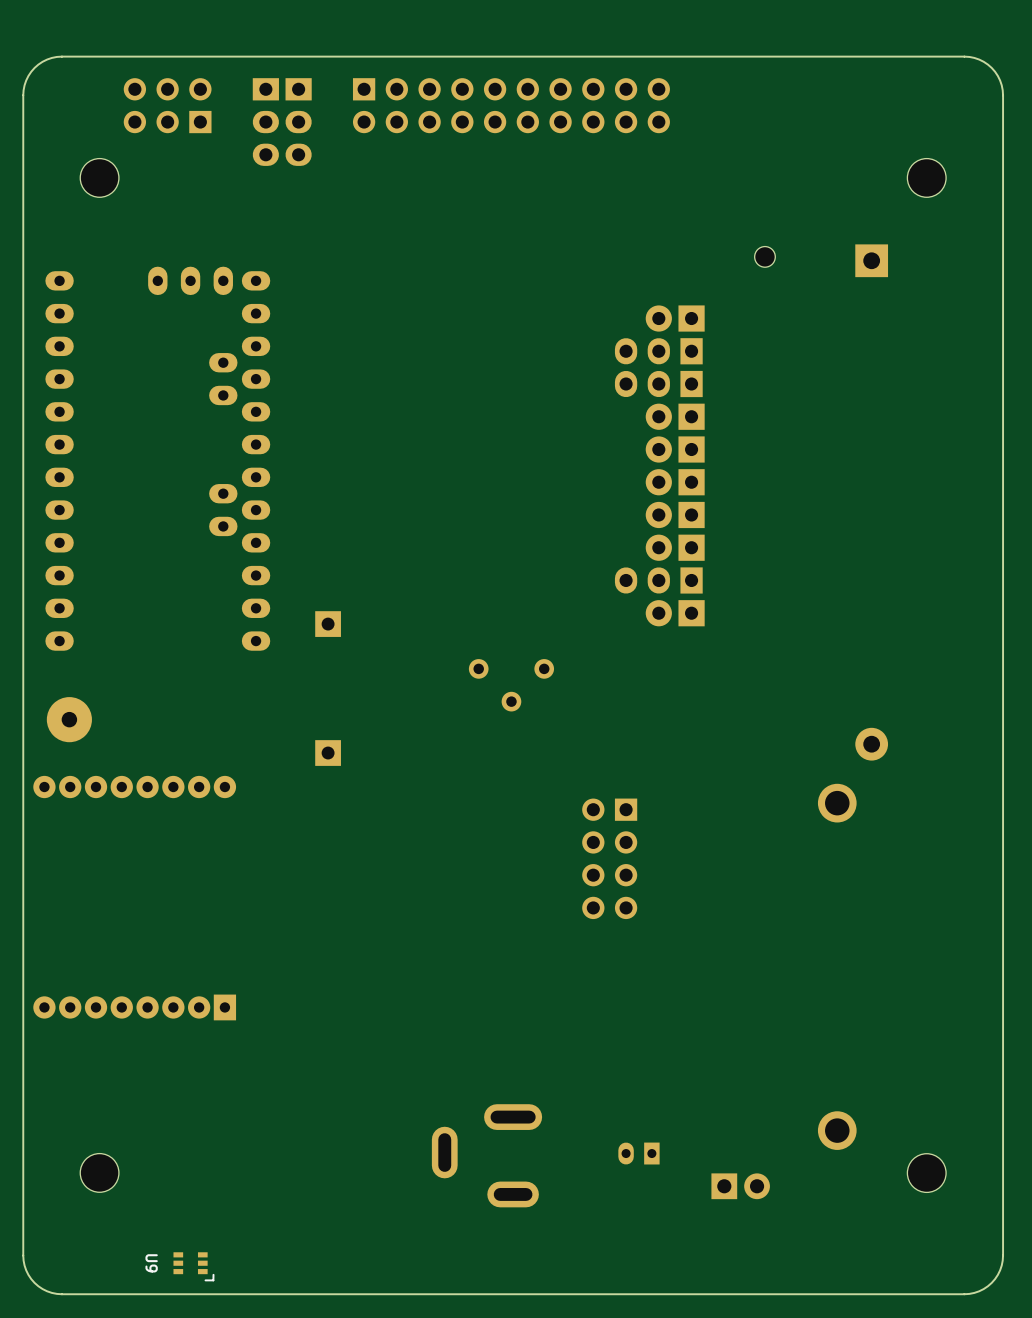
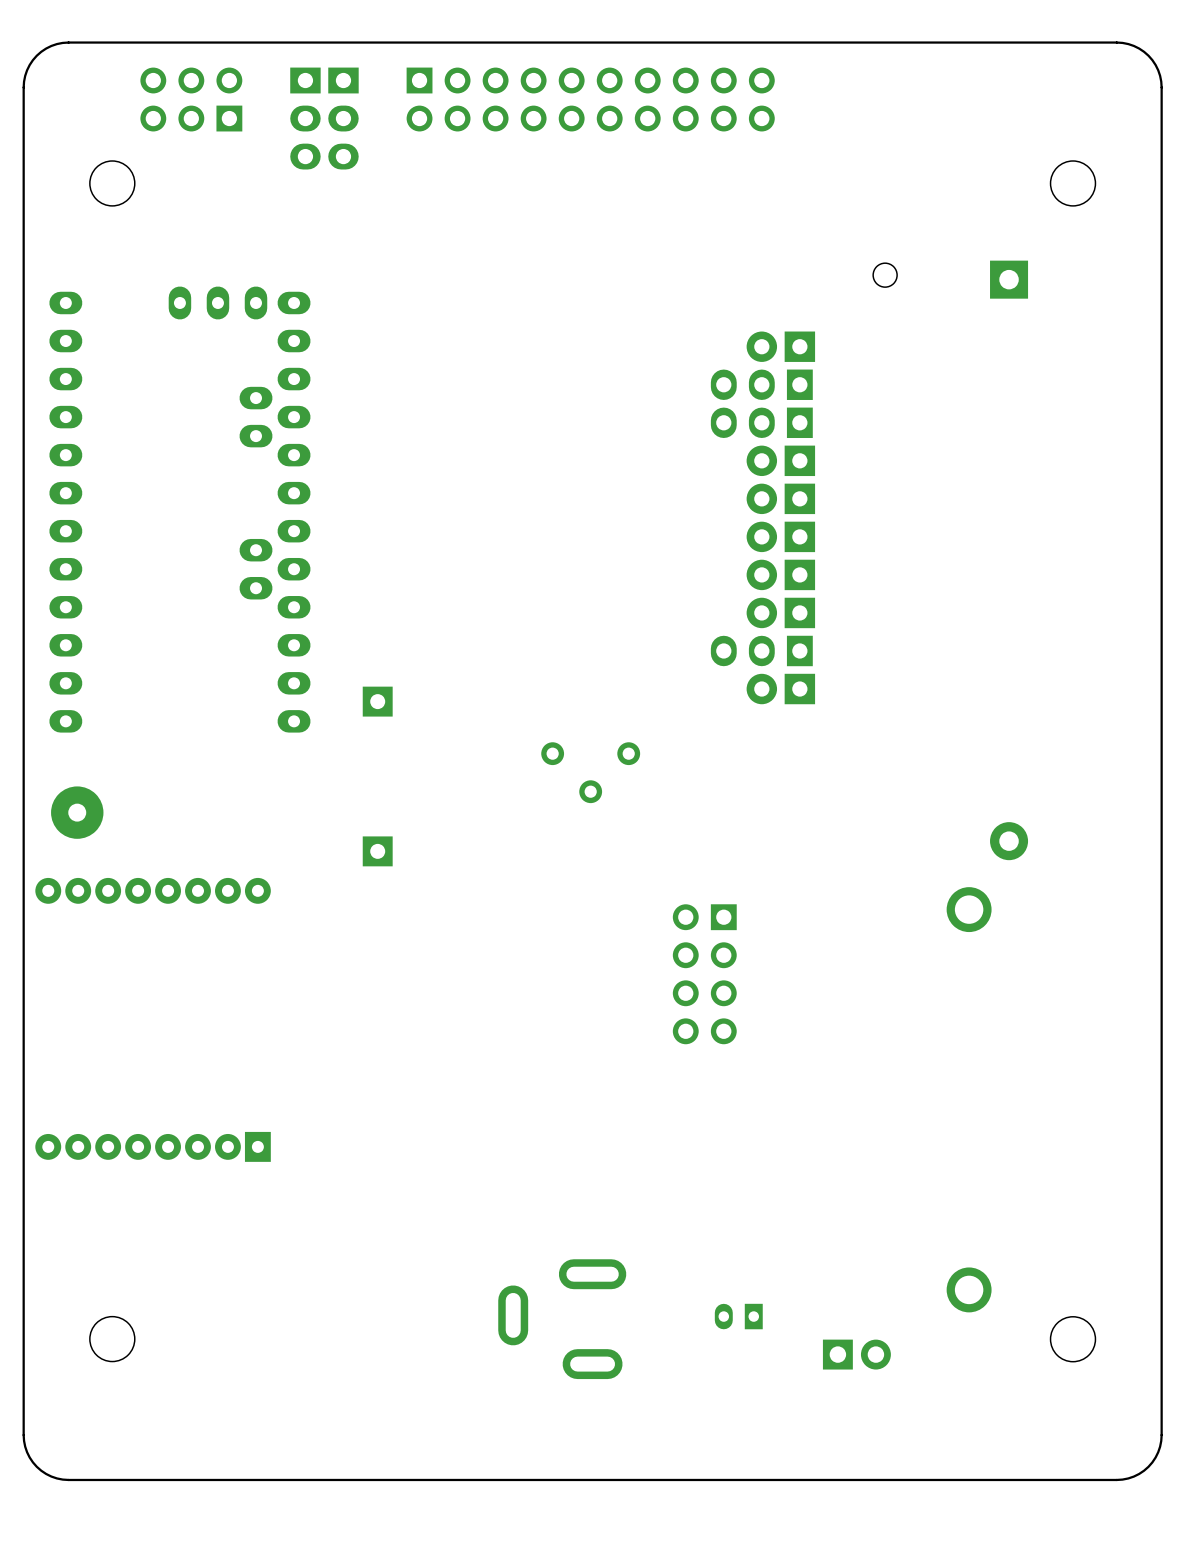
U9: (193, 1266) -> none

